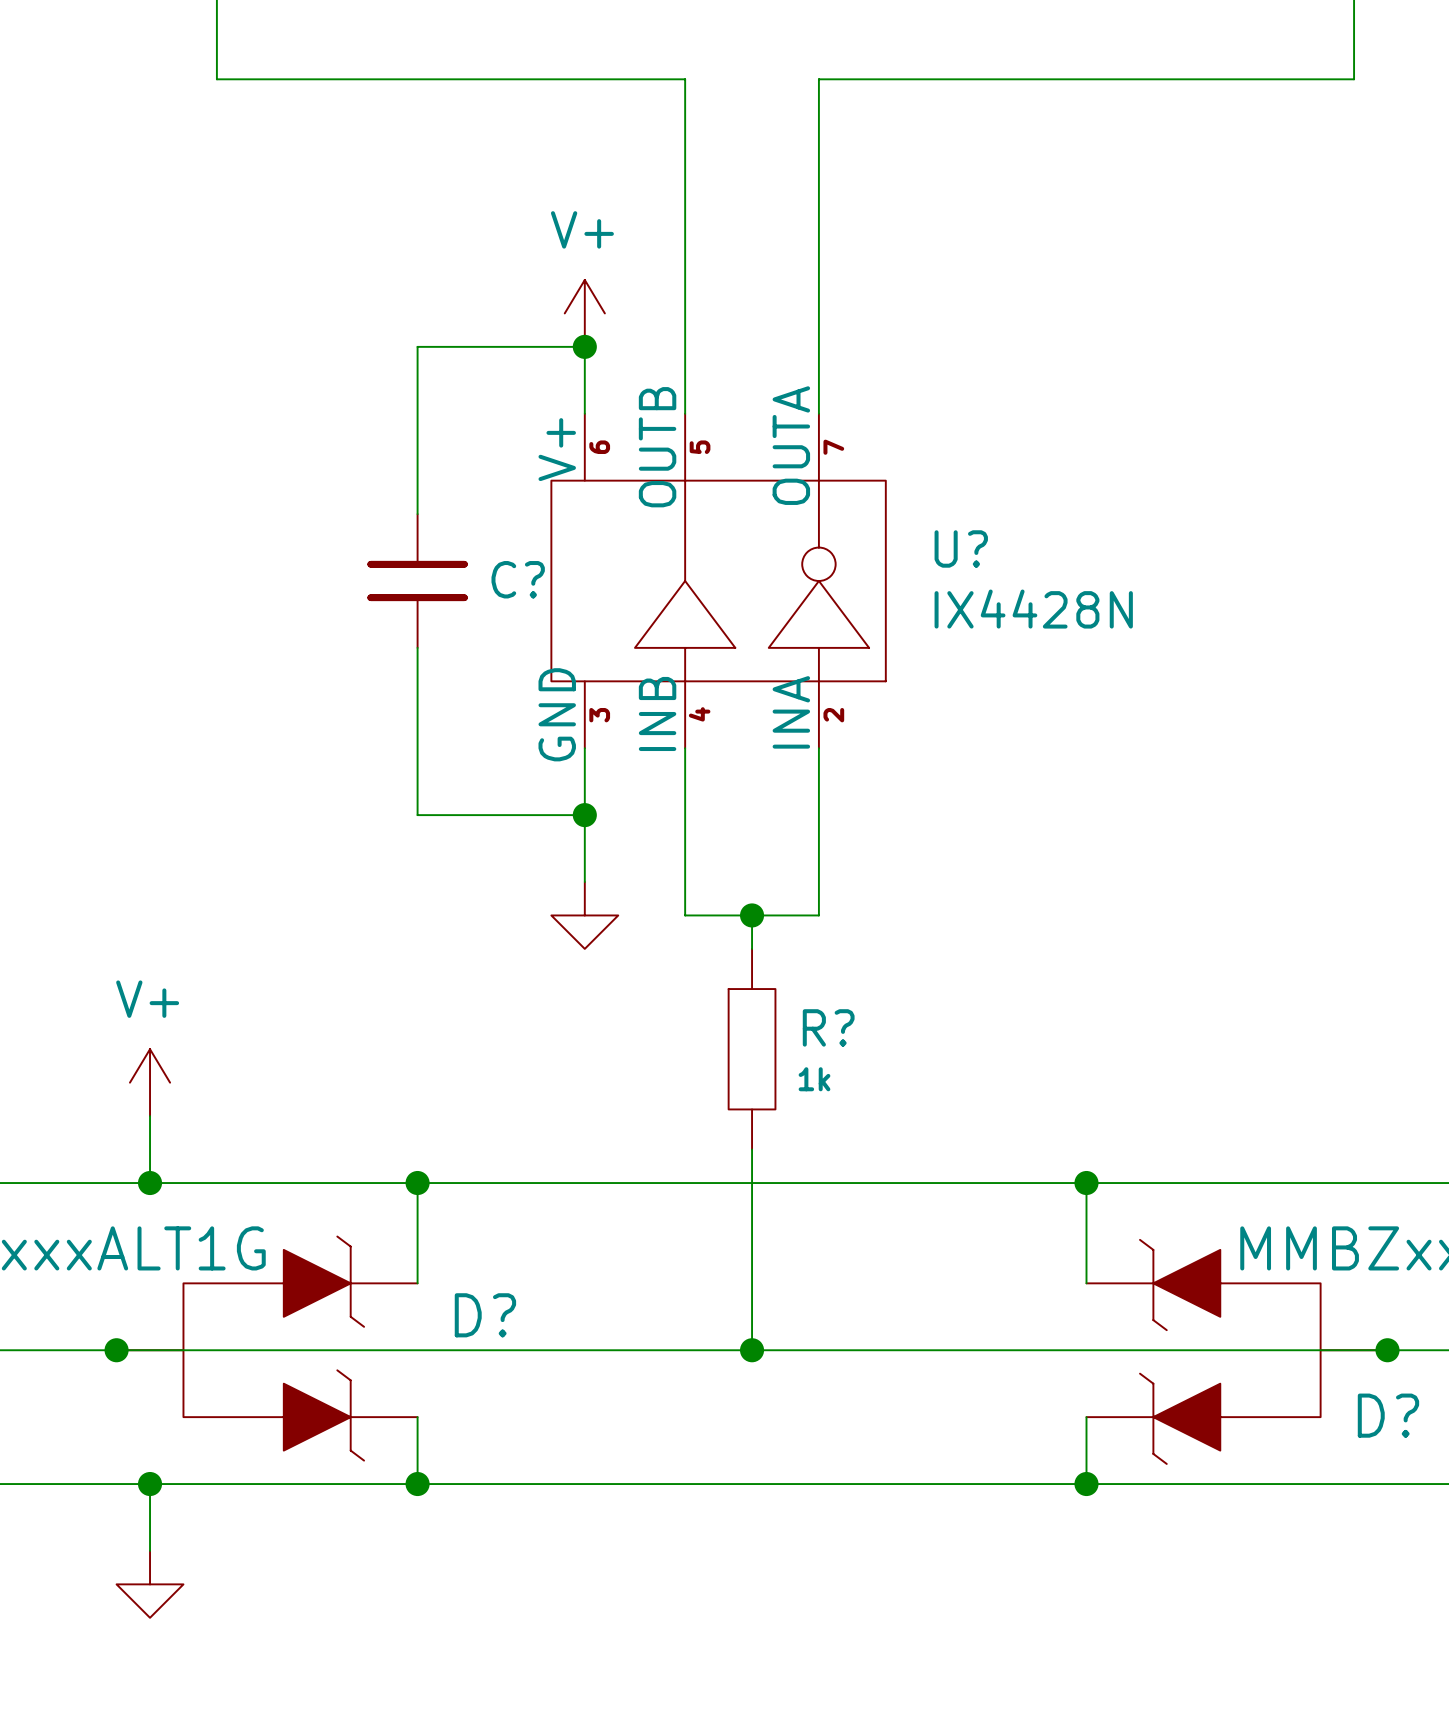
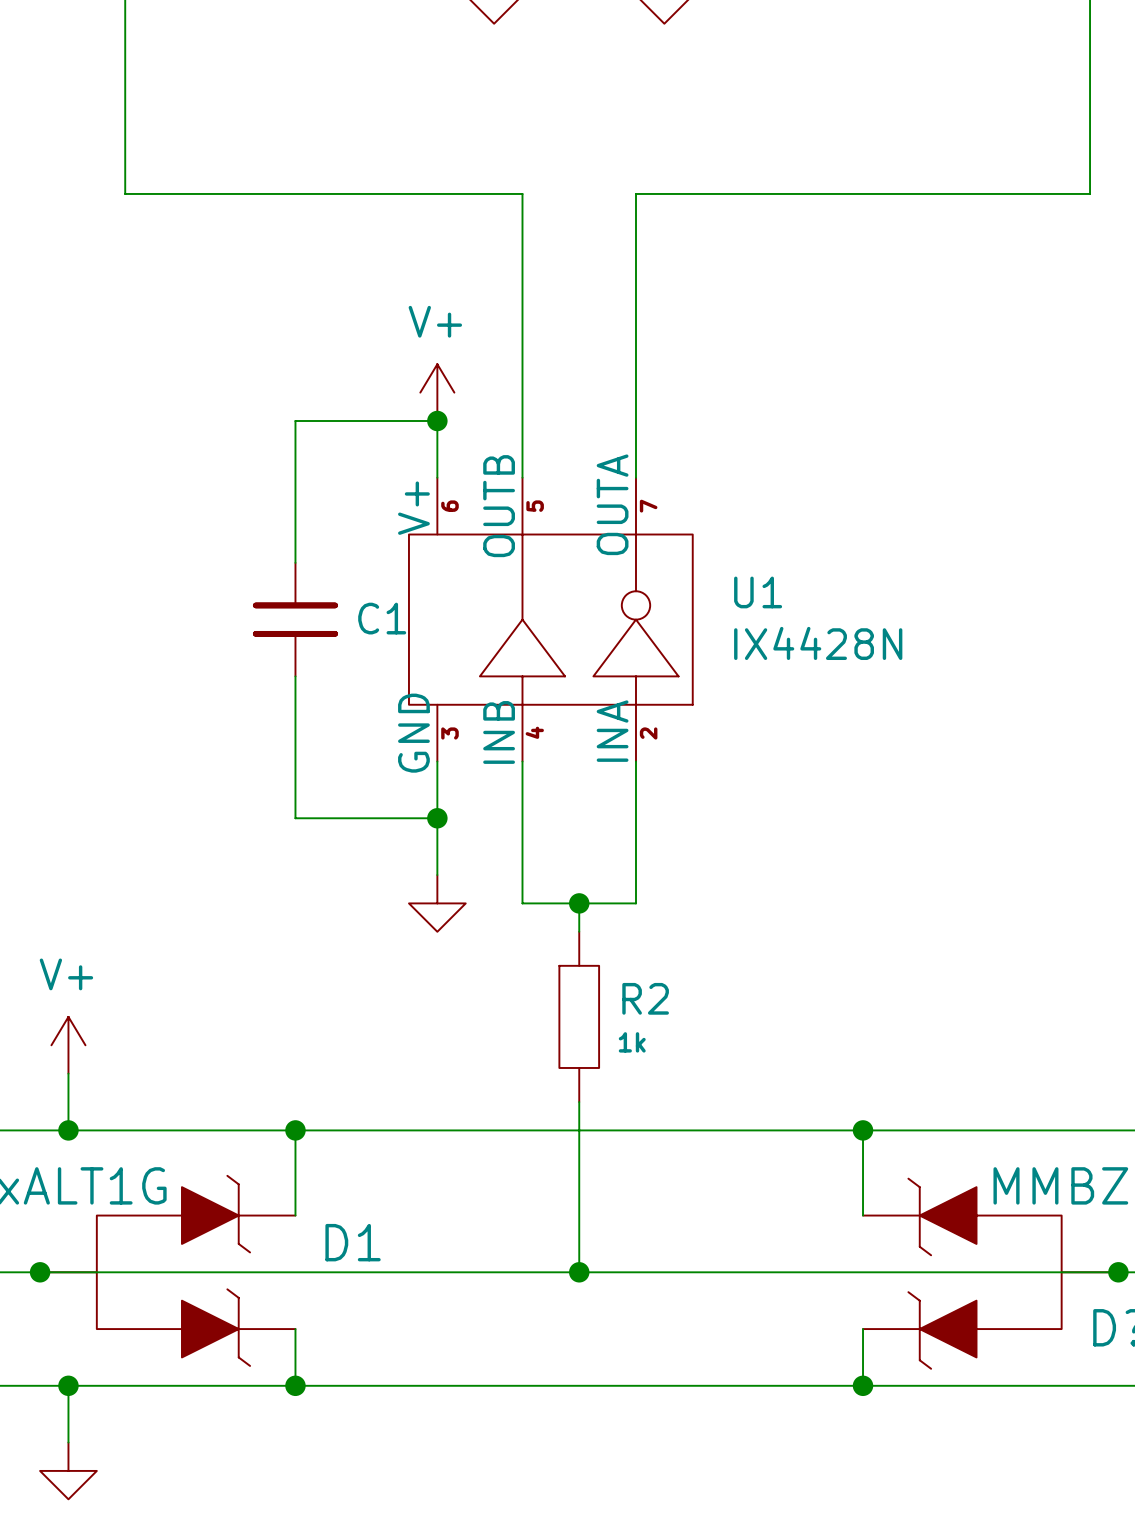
U? name: U? (961, 548) -> U1 (758, 592)
C? name: C? (518, 579) -> C1 (382, 618)
R? name: R? (828, 1027) -> R2 (645, 998)
D? name: D? (485, 1315) -> D1 (353, 1242)

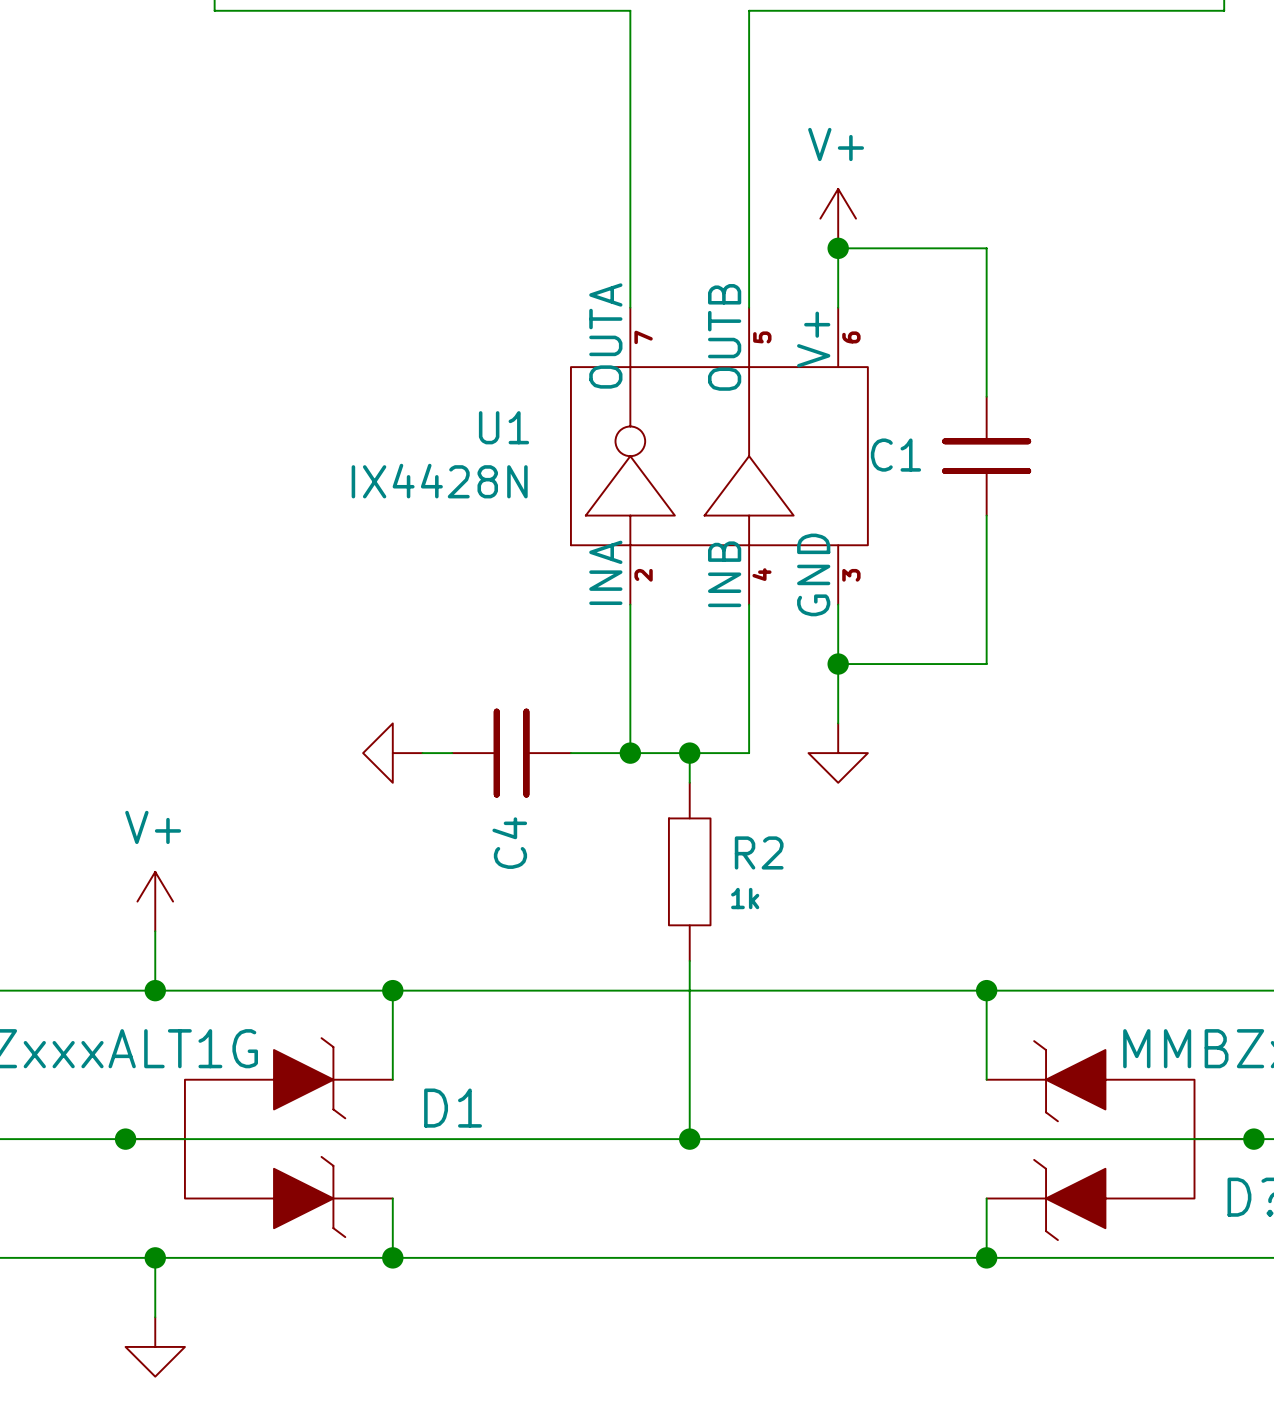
power symbol position: V+ (437, 392) -> V+ (838, 218)
junction: (437, 421) -> none
junction: none -> (838, 248)
wire: (437, 477) (437, 421) (295, 421) (295, 562) -> none
wire: none -> (838, 307) (838, 248) (986, 248) (986, 396)
C1 flip: as is (295, 619) -> left-right (986, 456)
C1 position: (295, 619) -> (986, 456)
U1 flip: as is (550, 619) -> left-right (719, 456)
wire: (295, 676) (295, 818) (437, 818) -> none
wire: none -> (986, 515) (986, 664) (838, 664)
wire: (437, 761) (437, 875) -> (838, 604) (838, 723)
junction position: (437, 818) -> (630, 753)
junction: none -> (838, 664)
power symbol: none -> (392, 753)
wire: none -> (422, 753) (452, 753)
C4: none -> (511, 753)
power symbol: (437, 903) -> none
wire: none -> (570, 753) (630, 753)
power symbol: none -> (838, 753)

